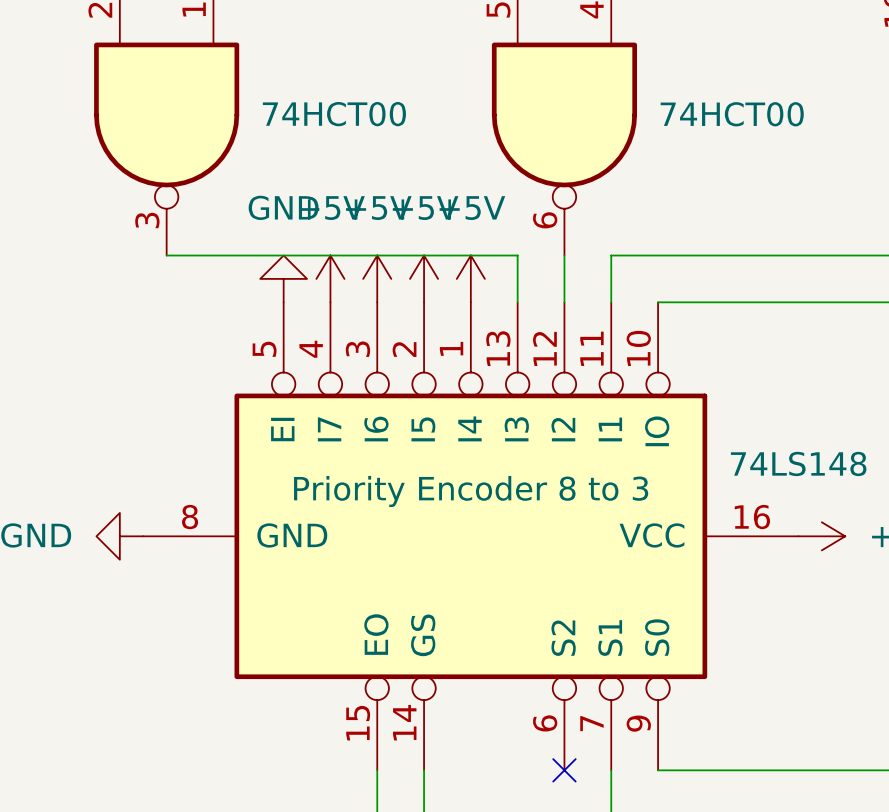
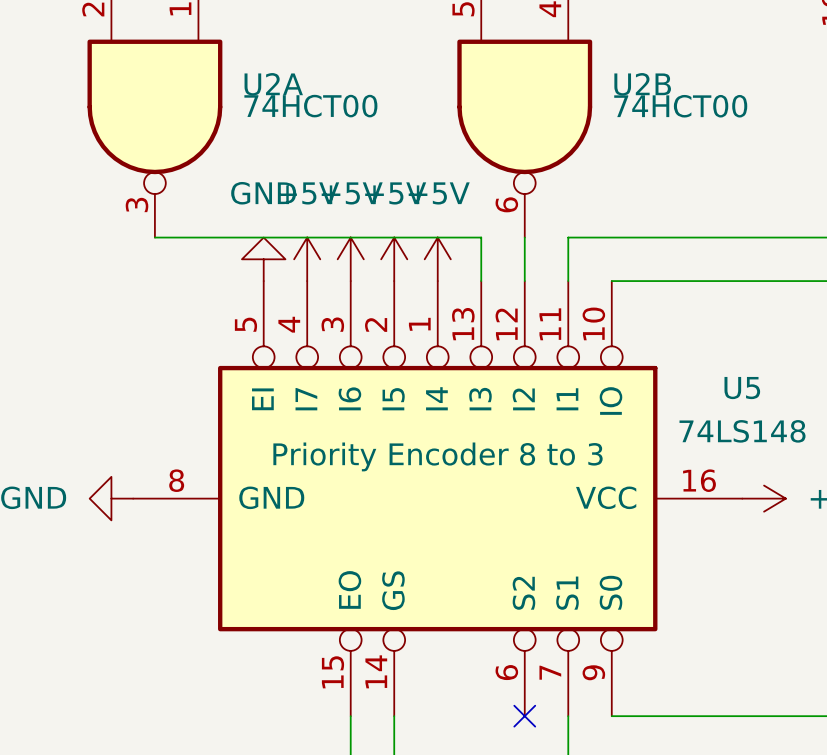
U2A name: none -> U2A (273, 84)
U2B name: none -> U2B (642, 84)
U5 name: none -> U5 (742, 388)

